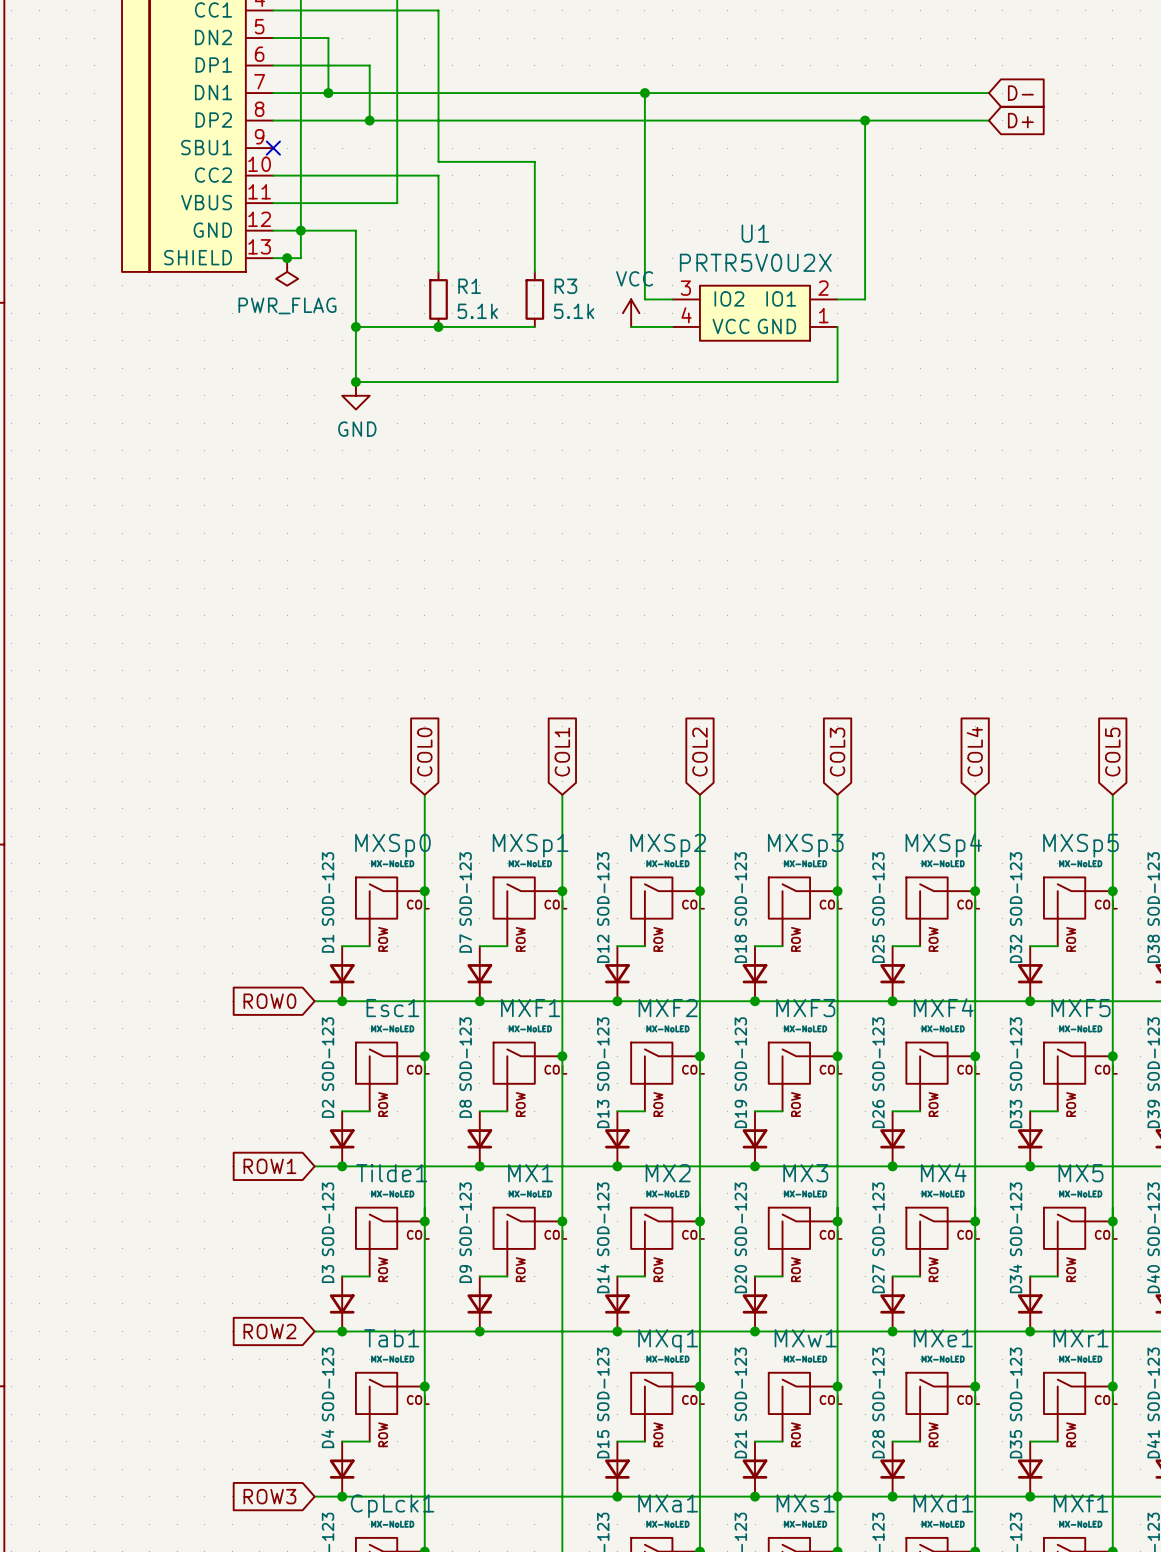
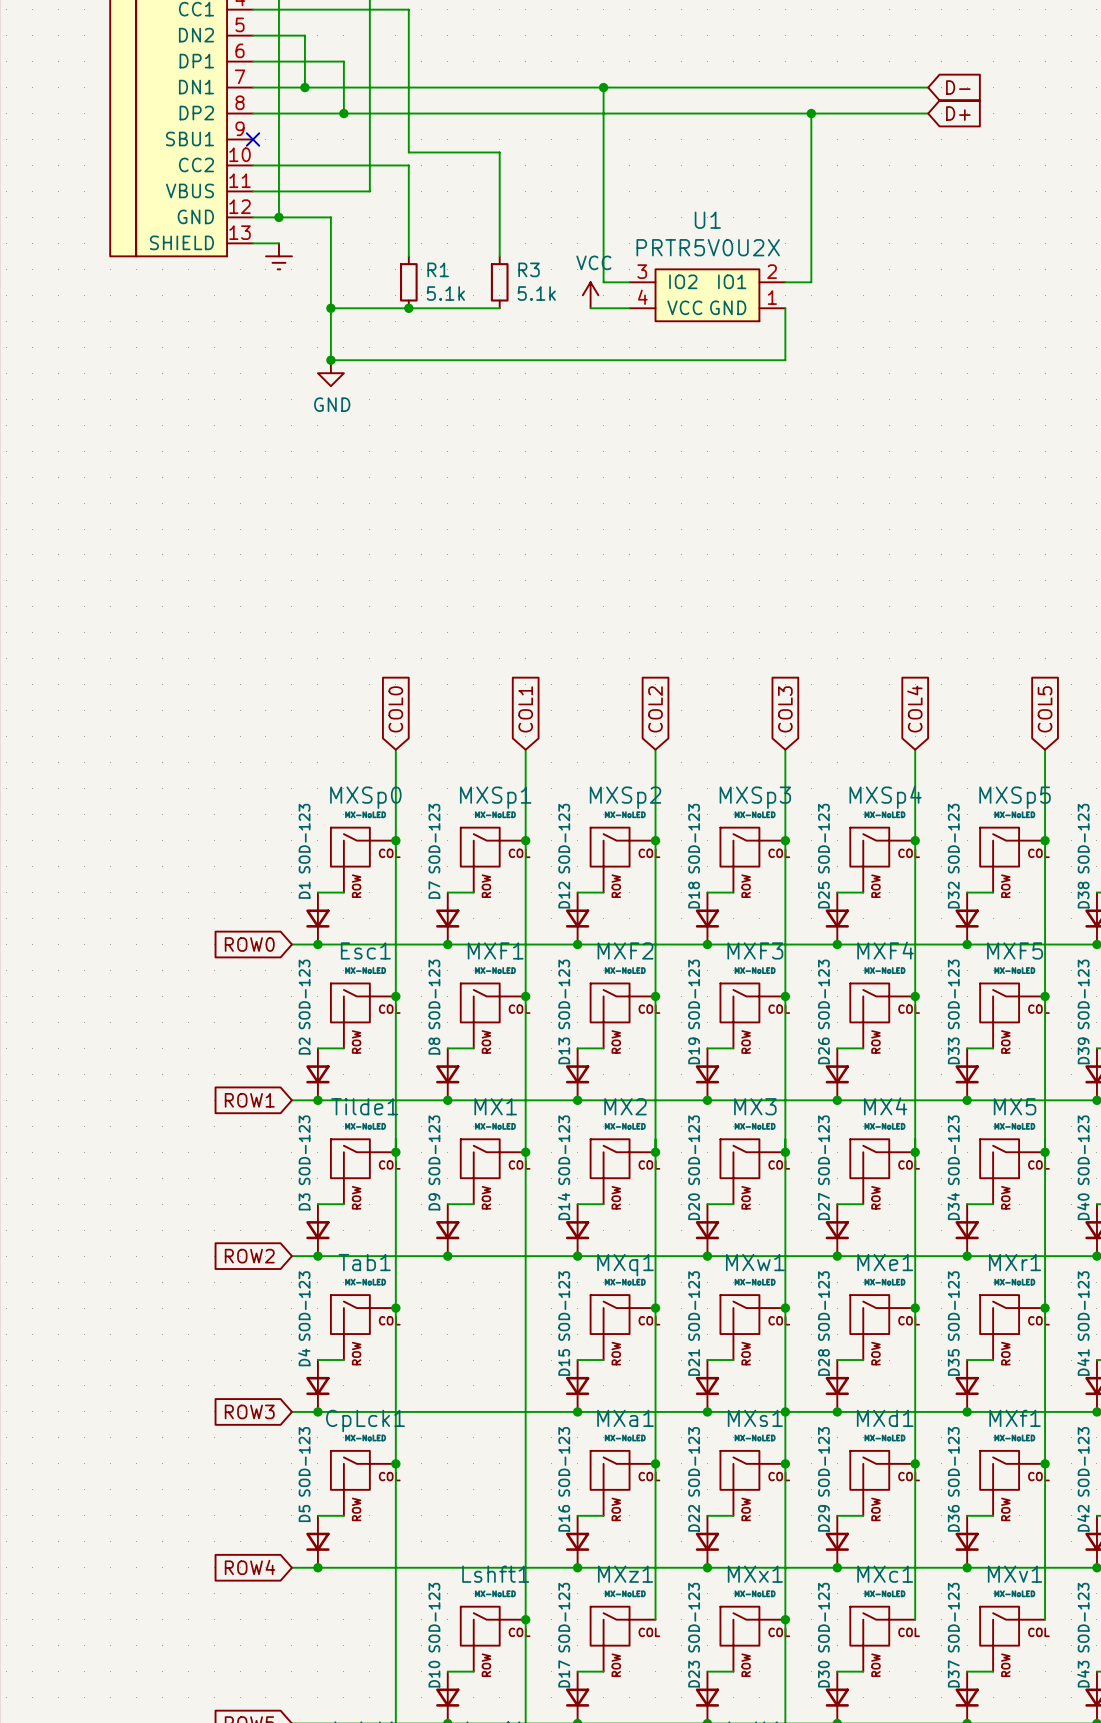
wire: (300, 230) (300, 258) -> none
junction: (287, 258) -> none
power symbol: PWR_FLAG (287, 271) -> none
power symbol: none -> (278, 256)

